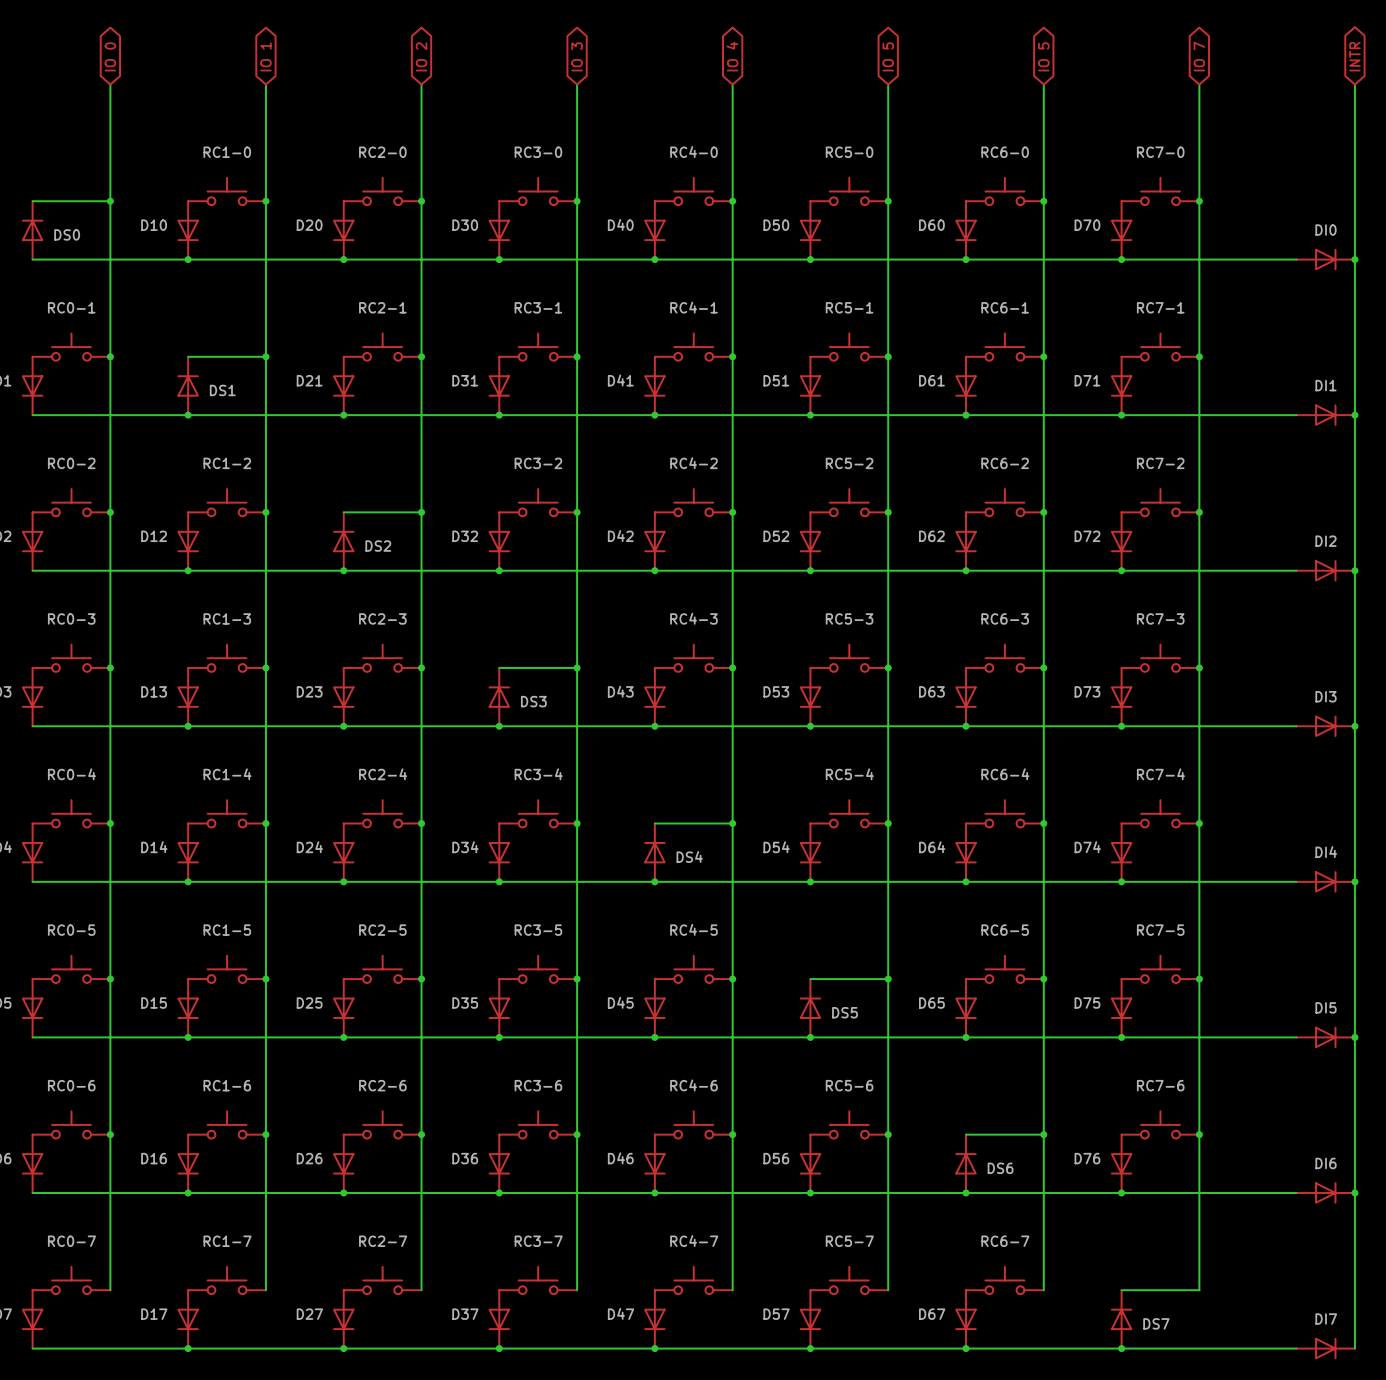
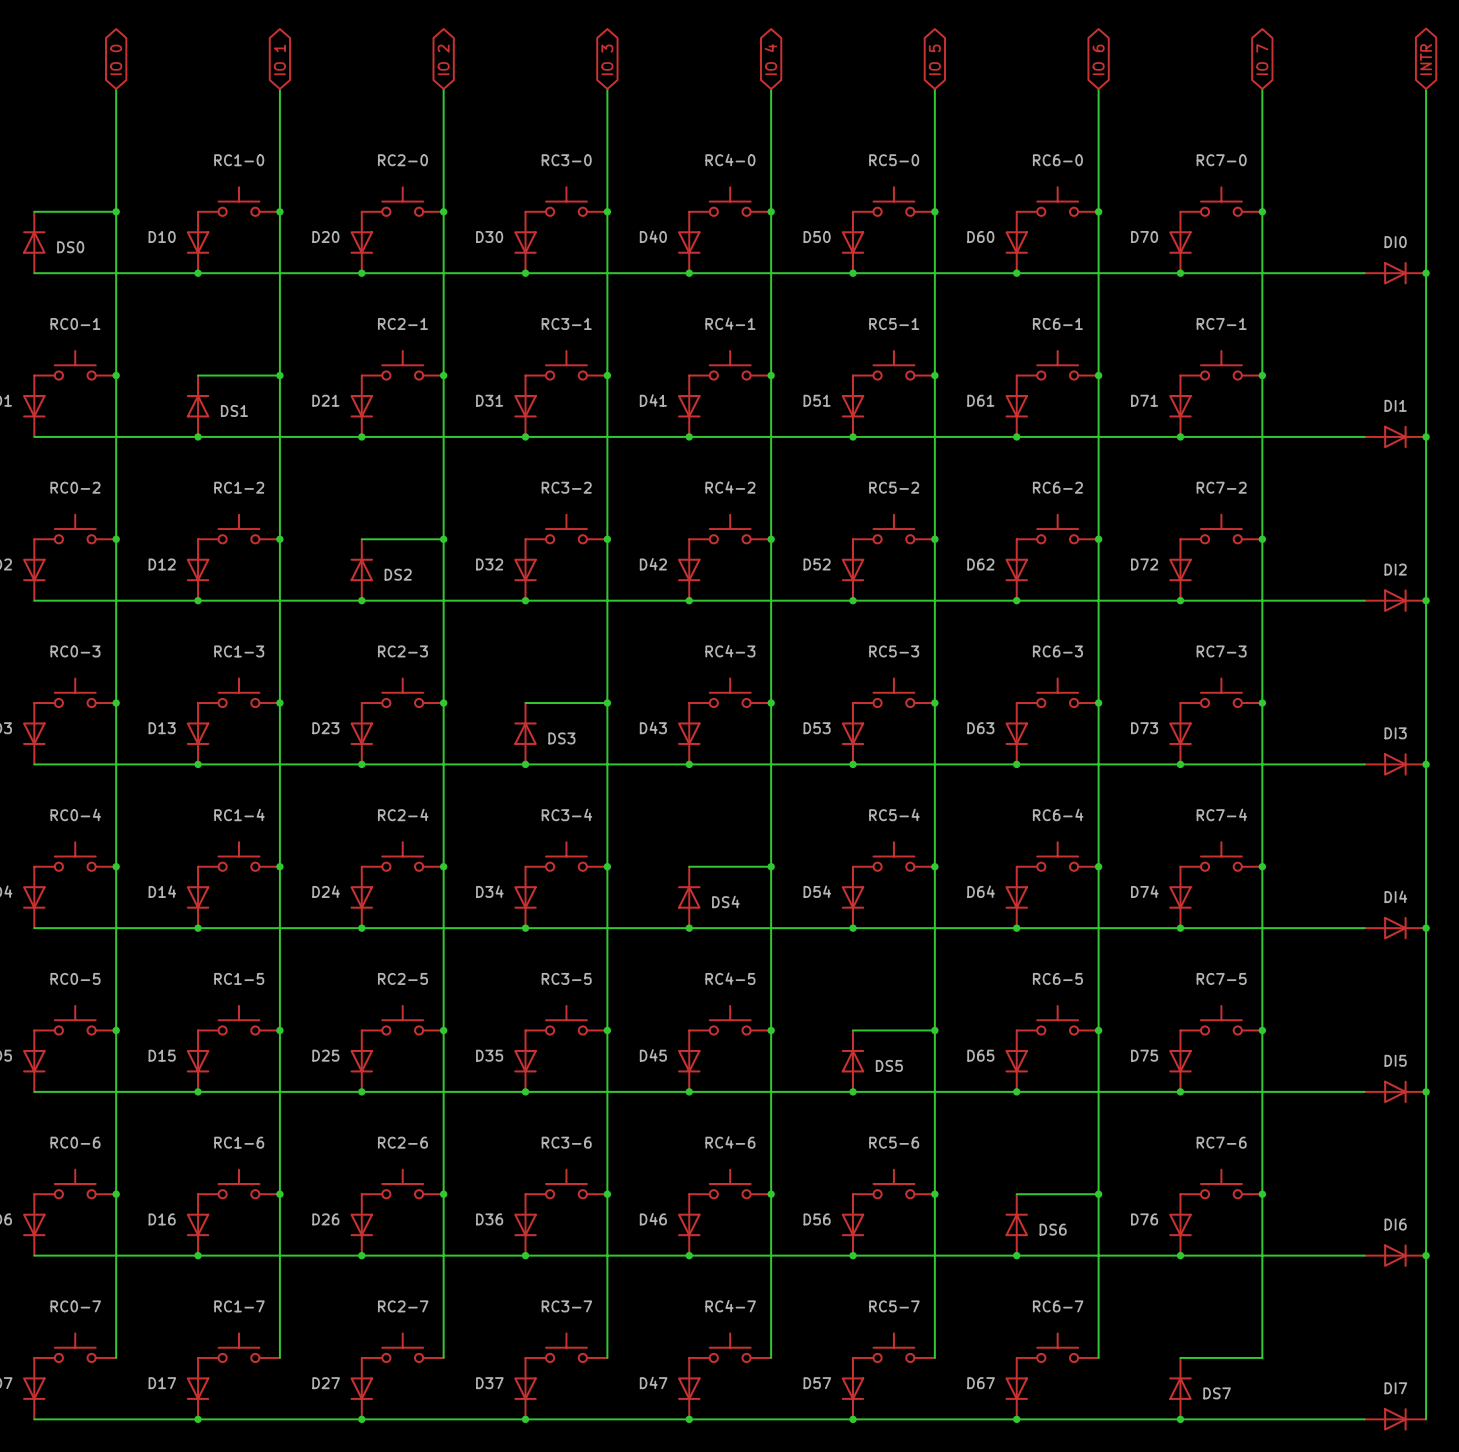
global label: IO 5 (1043, 56) -> IO 6 (1098, 59)

